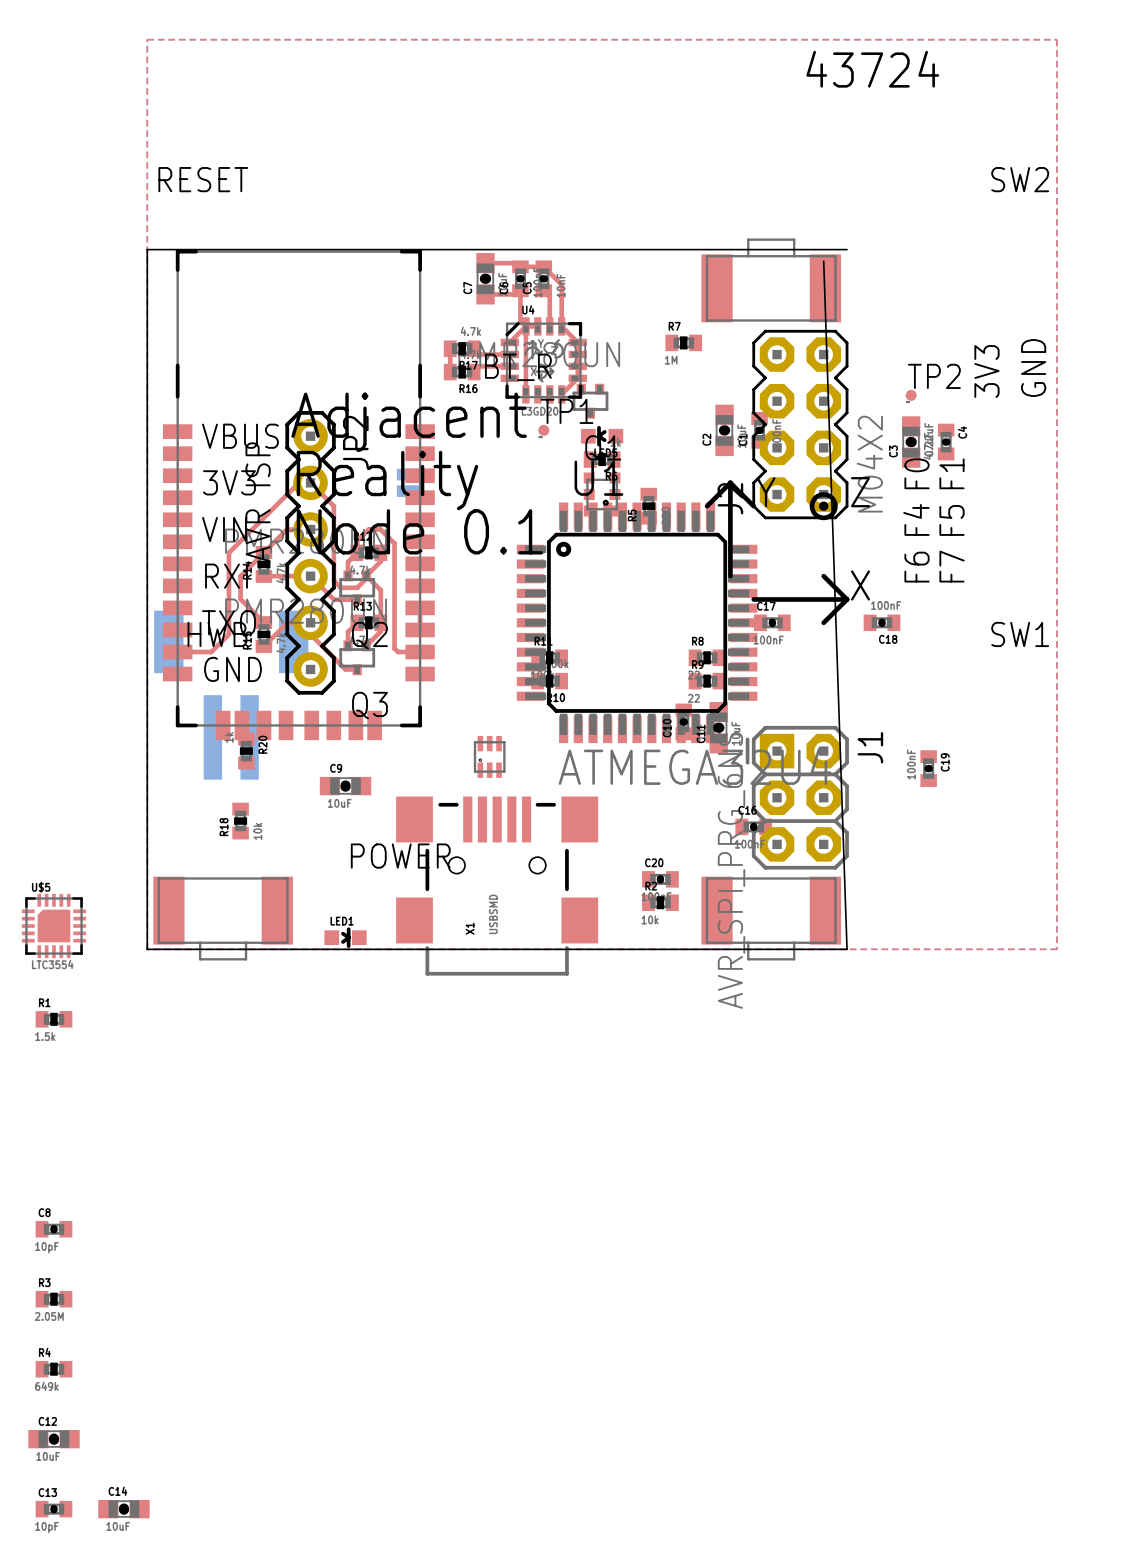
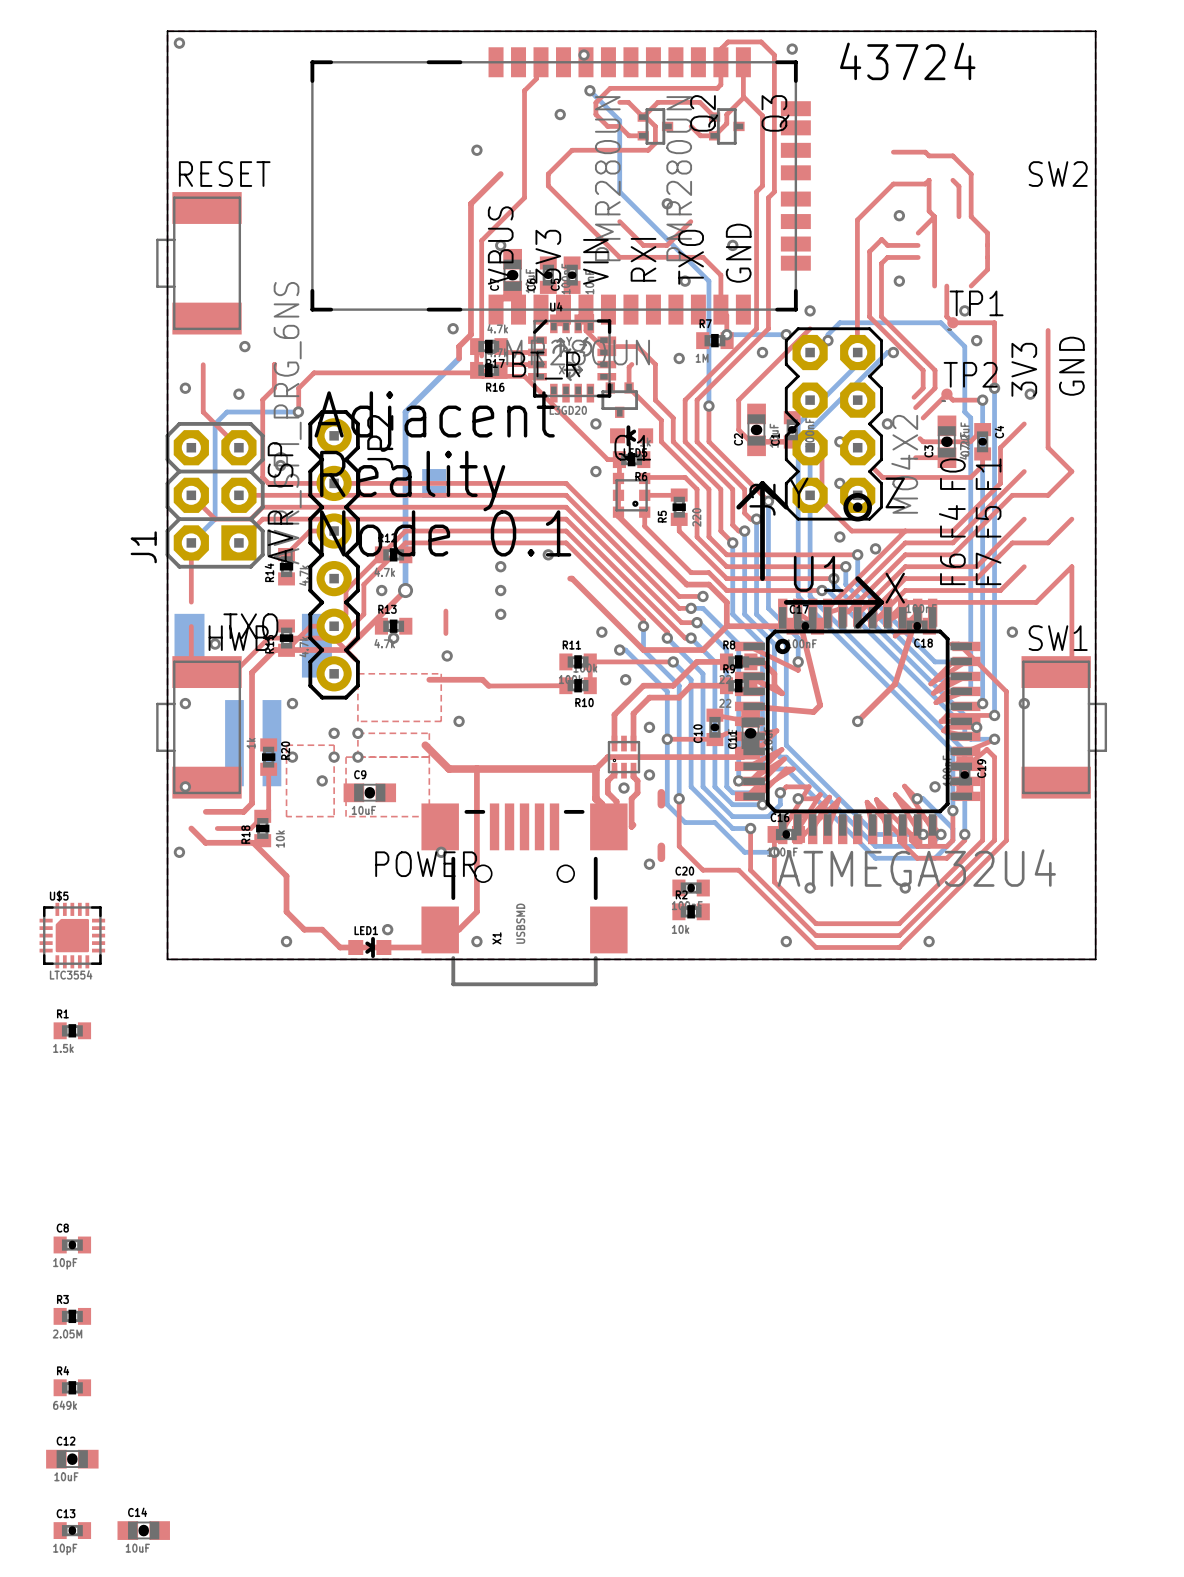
via: none -> (179, 43)
via: none -> (792, 49)
via: none -> (584, 55)
top track: none -> (541, 62) (536, 66) (536, 78) (524, 90) (524, 197) (481, 240) (481, 356)
top track: none -> (743, 62) (743, 97) (726, 114) (726, 123) (714, 135) (700, 135) (691, 126)
bottom track: none -> (589, 90) (619, 120) (619, 191) (708, 281) (708, 406)
via: none -> (589, 90)
top track: none -> (743, 96) (762, 115) (762, 185) (756, 191) (756, 328) (685, 400) (685, 441) (732, 489) (732, 525) (738, 531) (744, 531)
top track: none -> (619, 102) (628, 102) (643, 117)
via: none -> (560, 114)
top track: none -> (643, 117) (657, 102) (699, 102) (714, 117)
top track: none -> (643, 117) (646, 117) (655, 126) (655, 143) (648, 150) (572, 150) (548, 174) (548, 185) (619, 257) (703, 257) (720, 275) (720, 309) (726, 315) (726, 334)
top track: none -> (619, 126) (629, 135) (643, 135)
top track: none -> (619, 126) (607, 126) (595, 114) (595, 102) (610, 88) (717, 88) (720, 84) (720, 49) (727, 41) (761, 41) (774, 55) (774, 191) (768, 197) (768, 328) (697, 400) (697, 441) (744, 489) (744, 513) (750, 519) (756, 519)
via: none -> (476, 150)
top track: none -> (500, 174) (470, 203) (470, 334) (459, 346) (459, 358)
via: none -> (667, 203)
via: none -> (899, 215)
top track: none -> (934, 216) (929, 211) (929, 180) (925, 184) (893, 184) (857, 220) (857, 334)
top track: none -> (619, 221) (643, 245) (667, 245) (690, 221)
board edge: (147, 249) (847, 249) -> none
via: none -> (500, 245)
via: none -> (732, 245)
top track: none -> (918, 245) (887, 245) (881, 239) (869, 251) (869, 316) (923, 370) (923, 388) (914, 397)
text: none -> GND (738, 253)
text: none -> TXO (691, 257)
board edge: (823, 261) (847, 949) -> (167, 245) (167, 31) (1095, 31) (1095, 959) (881, 959)
top track: none -> (918, 257) (887, 257) (881, 263) (881, 316) (935, 370) (935, 388) (915, 407)
top track: (485, 263) (516, 263) (520, 266) (543, 266) (561, 284) (561, 326) (577, 342) (577, 378) (561, 394) -> (893, 152) (925, 152) (929, 155) (952, 155) (971, 174) (971, 216) (987, 233) (987, 269) (971, 286)
text: none -> RXI (643, 259)
part: none -> (198, 263)
part: (771, 280) -> none
via: none -> (685, 281)
via: none -> (899, 281)
top track: none -> (946, 286) (946, 316) (952, 322) (994, 322) (994, 388)
top track: (543, 290) (549, 296) (549, 326) -> (952, 180) (958, 186) (958, 216)
top track: (485, 294) (516, 294) (520, 290) (520, 321) (525, 326) -> none
top track: none -> (585, 309) (585, 330) (601, 346) (637, 346) (655, 364) (655, 400) (673, 417) (673, 441) (720, 489) (720, 531) (732, 542)
via: none -> (810, 310)
via: none -> (964, 310)
top track: (525, 326) (509, 342) -> (934, 216) (918, 233)
top track: (525, 326) (525, 394) -> (934, 216) (934, 286)
via: none -> (453, 328)
top track: none -> (810, 328) (738, 400) (738, 429) (750, 441) (786, 441) (789, 438)
top track: none -> (1048, 330) (1048, 447) (1071, 471) (1048, 495) (1012, 495) (952, 554) (905, 554) (848, 611) (842, 612)
bottom track: none -> (726, 334) (786, 334)
via: none -> (726, 334)
via: none -> (786, 334)
bottom track: none -> (827, 340) (827, 334) (839, 322) (940, 322) (964, 346) (964, 412) (970, 417) (970, 691)
via: none -> (827, 340)
via: none -> (976, 340)
via: none -> (244, 346)
via: none -> (762, 352)
bottom track: none -> (893, 352) (887, 352) (810, 429) (810, 596) (964, 751) (964, 834)
via: none -> (893, 352)
bottom track: none -> (459, 358) (405, 412) (405, 590)
via: none -> (679, 358)
bottom track: none -> (863, 358) (798, 423) (798, 596) (952, 751) (952, 810)
top track: none -> (203, 364) (203, 412) (238, 447)
top track: none -> (631, 364) (629, 367) (629, 387) (661, 420) (661, 441) (708, 489) (708, 536) (726, 554) (857, 554)
via: none -> (185, 388)
bottom track: none -> (994, 388) (994, 715)
via: none -> (994, 388)
via: none -> (238, 394)
via: none -> (1030, 394)
top track: none -> (982, 400) (952, 400) (946, 394) (923, 417)
bottom track: none -> (982, 400) (982, 703)
via: none -> (982, 400)
top track: none -> (708, 406) (708, 441) (768, 501)
via: none -> (708, 406)
top track: none -> (298, 412) (298, 388) (314, 372) (481, 372) (482, 370) (482, 376) (524, 376) (607, 459) (619, 459) (618, 516) (686, 584) (708, 584) (726, 602) (726, 626)
bottom track: none -> (298, 412) (227, 412) (215, 423) (215, 519) (191, 542)
via: none -> (298, 412)
via: none -> (595, 423)
via: none -> (887, 423)
top track: none -> (1024, 423) (1000, 447) (1000, 483) (952, 531) (851, 531) (822, 501) (822, 440)
TP1 position: (543, 430) -> (952, 322)
top track: none -> (982, 429) (970, 441) (923, 441) (919, 438)
text rotation: 0° (240, 436) -> 90° counterclockwise (500, 245)
text position: VBUS (240, 436) -> VBUS (500, 245)
via: none -> (839, 441)
top track: none -> (982, 453) (982, 465) (970, 477) (882, 477) (873, 468)
top track: none -> (915, 457) (946, 457)
via: none -> (280, 465)
via: none -> (595, 471)
top track: none -> (1024, 471) (952, 542) (905, 542) (838, 609) (827, 612)
top track: none -> (644, 478) (685, 477) (697, 489) (697, 536) (726, 566) (845, 566)
text rotation: 0° (229, 482) -> 90° counterclockwise (548, 256)
text position: 3V3 (229, 482) -> 3V3 (548, 256)
top track: (298, 482) (228, 552) (228, 634) (211, 652) (177, 652) -> (322, 483) (268, 483) (262, 477) (262, 399) (274, 388) (274, 364)
top track: (310, 482) (333, 506) (333, 580) (340, 587) (357, 587) (366, 578) (366, 575) -> (334, 483) (566, 483) (679, 596) (703, 596)
via: none -> (839, 483)
top track: none -> (191, 495) (215, 519) (250, 519) (262, 507) (566, 507) (681, 622) (697, 622)
top track: none -> (238, 495) (566, 495) (679, 608) (691, 608)
part rotation: 0° (298, 494) -> 90° counterclockwise (560, 185)
part position: (298, 494) -> (560, 185)
top track: none -> (679, 495) (644, 495)
bottom track: none -> (768, 501) (768, 608) (798, 638) (798, 661)
via: none -> (768, 501)
top track: none -> (644, 512) (644, 526) (691, 572) (708, 572) (726, 590) (822, 590)
bottom track: none -> (756, 519) (756, 614) (786, 644) (786, 745) (875, 834) (923, 834)
via: none -> (756, 519)
top track: none -> (1024, 519) (976, 566) (905, 566) (857, 614) (857, 612)
top track: none -> (1071, 519) (1048, 542) (1012, 542) (976, 578) (905, 578) (867, 616) (872, 612)
top track: none -> (679, 519) (679, 531) (726, 578) (833, 578)
text rotation: 0° (224, 529) -> 90° counterclockwise (595, 261)
text position: VIN (224, 529) -> VIN (595, 261)
bottom track: none -> (744, 531) (744, 614) (774, 644) (774, 751) (780, 757) (786, 757) (875, 846) (929, 846) (940, 834)
via: none -> (744, 531)
top track: none -> (905, 531) (827, 608)
via: none -> (839, 536)
top track: none -> (191, 542) (191, 602)
top track: none -> (238, 542) (262, 519) (566, 519) (685, 638) (691, 638)
bottom track: none -> (732, 542) (732, 614) (762, 644) (762, 763) (768, 769) (786, 769) (875, 858) (935, 858) (952, 840) (952, 828) (923, 798) (917, 798)
via: none -> (732, 542)
via: none -> (875, 548)
top track: (263, 552) (240, 576) (240, 599) (263, 622) -> none
top track: (356, 552) (357, 541) (368, 529) (380, 529) (394, 543) (394, 648) (398, 652) (420, 652) -> (381, 554) (405, 531) (566, 531) (667, 632) (667, 638)
top track: (380, 552) (380, 561) (366, 575) -> none
via: none -> (548, 554)
bottom track: none -> (857, 554) (857, 584) (935, 661) (952, 661)
via: none -> (857, 554)
top track: (348, 562) (348, 575) -> (372, 564) (346, 590) (346, 614)
via: none -> (500, 566)
bottom track: none -> (845, 566) (845, 584) (940, 679) (952, 679)
via: none -> (845, 566)
top track: none -> (1024, 566) (1000, 590) (905, 590) (876, 619) (887, 612)
top track: (366, 575) (380, 590) (380, 631) (366, 645) -> none
text: RXI (226, 576) -> none
top track: (263, 576) (310, 576) (334, 599) (357, 599) -> none
top track: none -> (570, 578) (643, 650) (703, 650) (726, 626)
bottom track: none -> (833, 578) (833, 584) (976, 727)
via: none -> (833, 578)
Q2 rotation: 0° (357, 587) -> 90° counterclockwise (655, 126)
Q2 position: (357, 587) -> (655, 126)
via: none -> (381, 590)
top track: none -> (405, 590) (346, 650) (274, 650) (252, 672) (252, 803) (243, 811) (205, 811)
via: none -> (405, 590)
via: none -> (500, 590)
bottom track: none -> (822, 590) (827, 590) (964, 727) (964, 733) (970, 739) (994, 739)
via: none -> (822, 590)
via: none -> (703, 596)
bottom track: none -> (691, 608) (703, 608) (738, 644) (738, 780)
via: none -> (691, 608)
top track: none -> (902, 612) (885, 621) (905, 602) (1036, 602) (1071, 566) (1071, 660) (1056, 672)
via: none -> (500, 614)
bottom track: none -> (697, 622) (699, 622) (726, 650) (726, 786) (732, 792) (750, 792)
via: none -> (697, 622)
top track: (357, 622) (348, 631) (348, 645) -> none
top track: none -> (643, 626) (643, 620) (566, 542) (405, 542) (363, 584) (363, 614) (340, 638) (268, 638) (234, 672) (204, 672) (203, 673) (191, 661) (191, 626)
bottom track: none -> (643, 626) (643, 650) (679, 685) (679, 798)
via: none -> (643, 626)
U1 position: (637, 622) -> (857, 721)
top track: none -> (726, 626) (793, 626)
top track: none -> (817, 626) (820, 628) (797, 612) (820, 705) (813, 712) (749, 706) (755, 712) (746, 721) (714, 715)
top track: none -> (905, 626) (895, 636) (917, 612) (895, 683) (857, 721)
via: none -> (601, 632)
via: none -> (1012, 632)
via: none -> (393, 638)
bottom track: none -> (667, 638) (703, 673) (703, 786) (732, 816) (768, 816) (780, 804) (780, 792)
via: none -> (667, 638)
bottom track: none -> (691, 638) (714, 661) (714, 786) (732, 804) (762, 804)
via: none -> (691, 638)
via: none -> (215, 644)
top track: none -> (749, 646) (798, 670) (798, 661)
top track: none -> (966, 646) (951, 644) (958, 644) (1006, 691) (1006, 840) (899, 947) (816, 947) (738, 870) (703, 870) (679, 846) (679, 798)
bottom track: none -> (619, 650) (625, 650) (667, 691) (667, 804) (685, 822) (714, 822) (744, 852) (774, 852)
via: none -> (619, 650)
via: none -> (447, 655)
top track: (331, 655) (345, 669) (357, 669) -> none
Q3 rotation: 0° (357, 657) -> 90° counterclockwise (726, 126)
Q3 position: (357, 657) -> (726, 126)
top track: none -> (673, 661) (590, 661) (590, 685)
bottom track: none -> (673, 661) (691, 679) (691, 786) (732, 828) (750, 828)
via: none -> (673, 661)
top track: none -> (726, 661) (697, 661) (673, 685) (643, 685) (614, 714) (614, 743)
top track: none -> (750, 661) (762, 661) (774, 673) (774, 685) (781, 693) (749, 676)
via: none -> (798, 661)
top track: none -> (966, 661) (930, 683) (952, 661)
text: GND (232, 669) -> none
top zone outline: none -> (357, 673) (357, 721) (441, 721) (441, 673) (357, 673)
top track: none -> (966, 676) (933, 693) (946, 679) (952, 679)
top track: none -> (429, 679) (482, 679) (488, 685) (565, 685)
via: none -> (625, 679)
top track: none -> (726, 685) (691, 685) (679, 697) (649, 697) (633, 713) (633, 743)
top track: none -> (966, 691) (935, 702) (946, 691) (970, 691)
via: none -> (185, 703)
via: none -> (292, 703)
via: none -> (982, 703)
via: none -> (1024, 703)
top track: none -> (994, 715) (946, 715) (940, 721) (966, 721)
via: none -> (994, 715)
via: none -> (459, 721)
via: none -> (857, 721)
via: none -> (649, 727)
top track: none -> (976, 727) (946, 727) (943, 730) (966, 736)
via: none -> (976, 727)
part: none -> (1064, 727)
via: none -> (334, 733)
via: none -> (357, 733)
top track: none -> (726, 733) (714, 739) (667, 739)
top track: none -> (749, 736) (776, 730) (762, 745) (754, 745) (742, 757) (607, 757) (595, 768)
via: none -> (667, 739)
top track: none -> (994, 739) (966, 751)
via: none -> (994, 739)
top zone outline: none -> (286, 745) (334, 745) (334, 816) (286, 816) (286, 745)
top track: none -> (425, 745) (449, 769) (595, 769) (595, 798) (601, 804) (601, 826)
via: none -> (292, 757)
via: none -> (334, 757)
top zone outline: none -> (357, 757) (357, 733) (429, 733) (429, 816) (346, 816) (346, 757) (429, 757)
via: none -> (357, 757)
part position: (489, 756) -> (623, 757)
top track: none -> (964, 762) (976, 762) (982, 769) (982, 840) (899, 923) (816, 923) (774, 882) (774, 834) (793, 815) (811, 815) (829, 797) (812, 830)
top track: none -> (749, 766) (781, 749) (750, 780) (738, 780)
top track: none -> (966, 766) (986, 749) (994, 757) (994, 840) (899, 935) (816, 935) (750, 870) (750, 828)
top track: none -> (476, 769) (476, 911) (459, 929) (441, 929) (423, 947) (340, 947) (322, 929) (304, 929) (286, 911) (286, 876) (253, 842) (205, 842) (191, 828)
top track: none -> (268, 769) (268, 810) (250, 828) (217, 828)
top track: none -> (614, 770) (614, 774) (607, 780) (607, 792) (616, 801) (616, 826)
top track: none -> (633, 770) (633, 776) (637, 780) (637, 792) (631, 798) (631, 826) (633, 824)
via: none -> (649, 774)
via: none -> (322, 780)
via: none -> (738, 780)
top track: none -> (749, 781) (784, 758) (750, 792)
via: none -> (185, 786)
via: none -> (935, 786)
via: none -> (623, 788)
top track: none -> (661, 792) (661, 804)
top track: none -> (780, 792) (786, 786) (809, 786) (782, 830)
via: none -> (780, 792)
top track: none -> (749, 796) (793, 769) (786, 769) (762, 792) (762, 804)
via: none -> (679, 798)
top track: none -> (798, 798) (816, 798) (820, 794) (797, 830)
via: none -> (798, 798)
top track: none -> (917, 798) (904, 786) (932, 830)
via: none -> (917, 798)
via: none -> (762, 804)
J1 rotation: 0° (797, 797) -> 180° (218, 495)
J1 position: (797, 797) -> (218, 495)
top track: none -> (952, 810) (952, 840) (946, 846) (917, 846) (911, 840) (911, 834) (876, 799) (887, 830)
via: none -> (952, 810)
via: none -> (750, 828)
top track: none -> (827, 830) (838, 799) (804, 834) (798, 834)
top track: none -> (872, 830) (867, 802) (899, 834) (899, 840) (917, 858) (946, 858) (964, 840) (964, 834)
top track: none -> (917, 830) (895, 794) (911, 810) (917, 810) (940, 834)
via: none -> (923, 834)
via: none -> (940, 834)
via: none -> (964, 834)
top track: none -> (661, 846) (661, 858)
via: none -> (179, 852)
via: none -> (441, 852)
via: none -> (774, 852)
via: none -> (649, 864)
via: none -> (810, 888)
via: none -> (905, 888)
part rotation: 0° (223, 918) -> 90° clockwise (198, 727)
part position: (223, 918) -> (198, 727)
part: (771, 918) -> none
via: none -> (387, 929)
via: none -> (286, 941)
via: none -> (476, 941)
via: none -> (786, 941)
via: none -> (929, 941)

